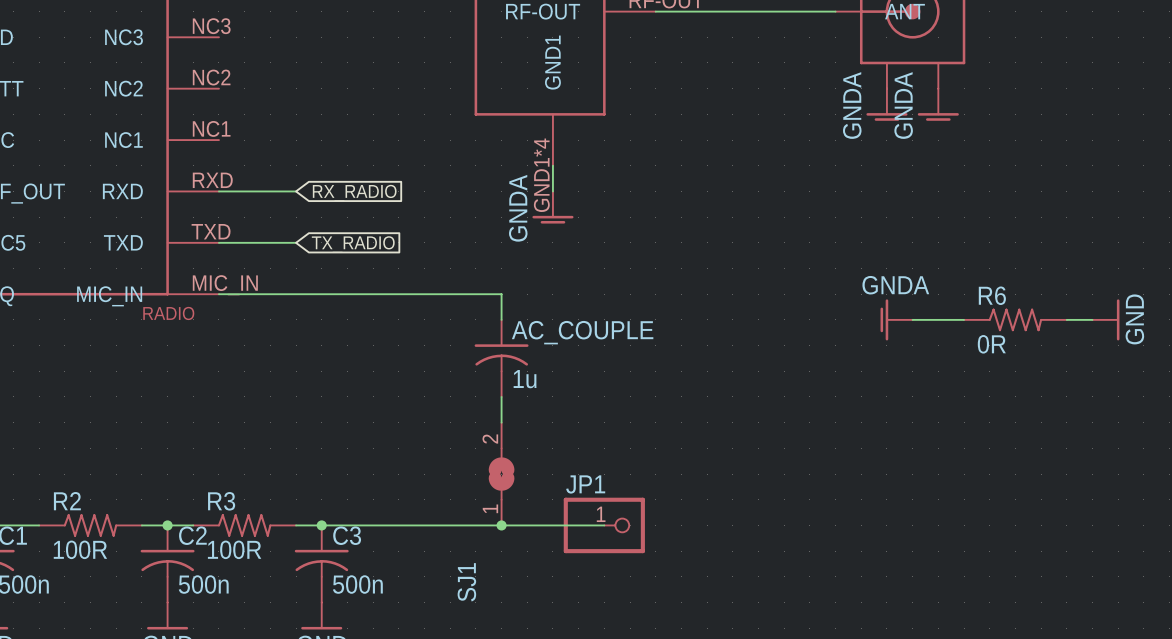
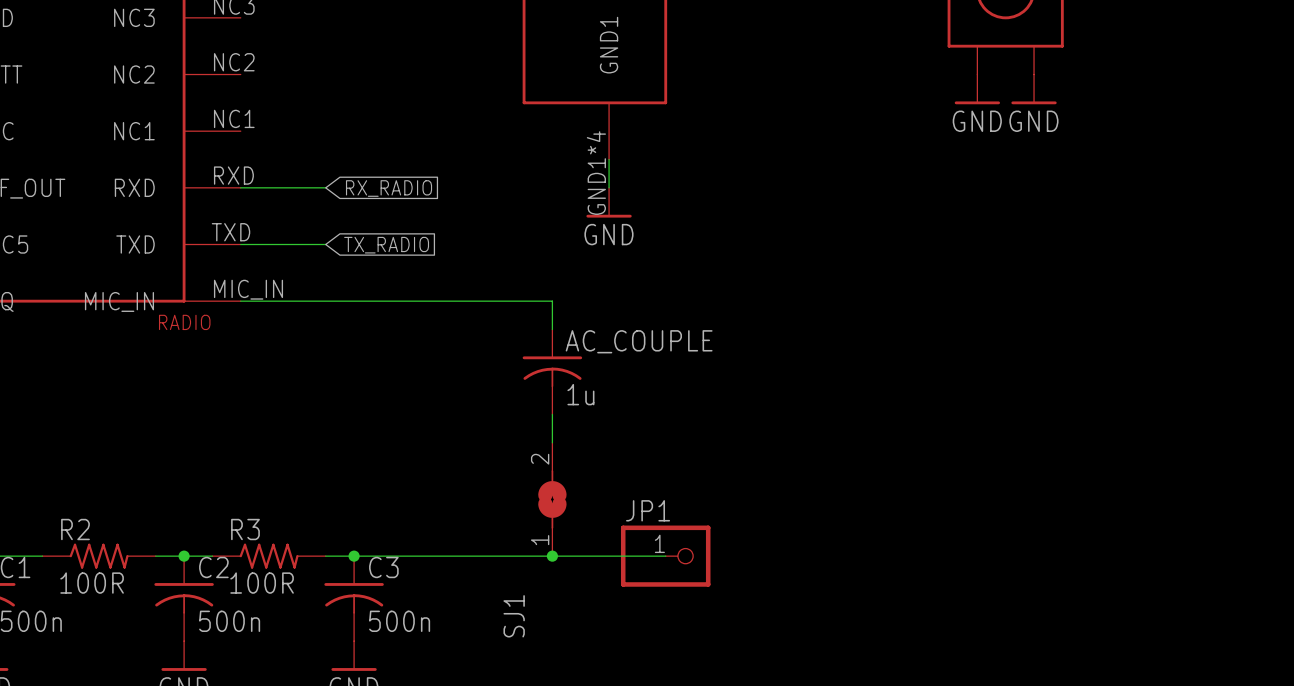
power symbol: GNDA (886, 104) -> GND (977, 89)
power symbol: GNDA (938, 104) -> GND (1034, 89)
power symbol: GNDA (552, 207) -> GND (609, 202)
power symbol: GNDA (896, 319) -> none
wire: (912, 319) (964, 319) -> none
R6: 0R (1015, 319) -> none
wire: (1066, 319) (1092, 319) -> none
power symbol: GND (1105, 319) -> none

